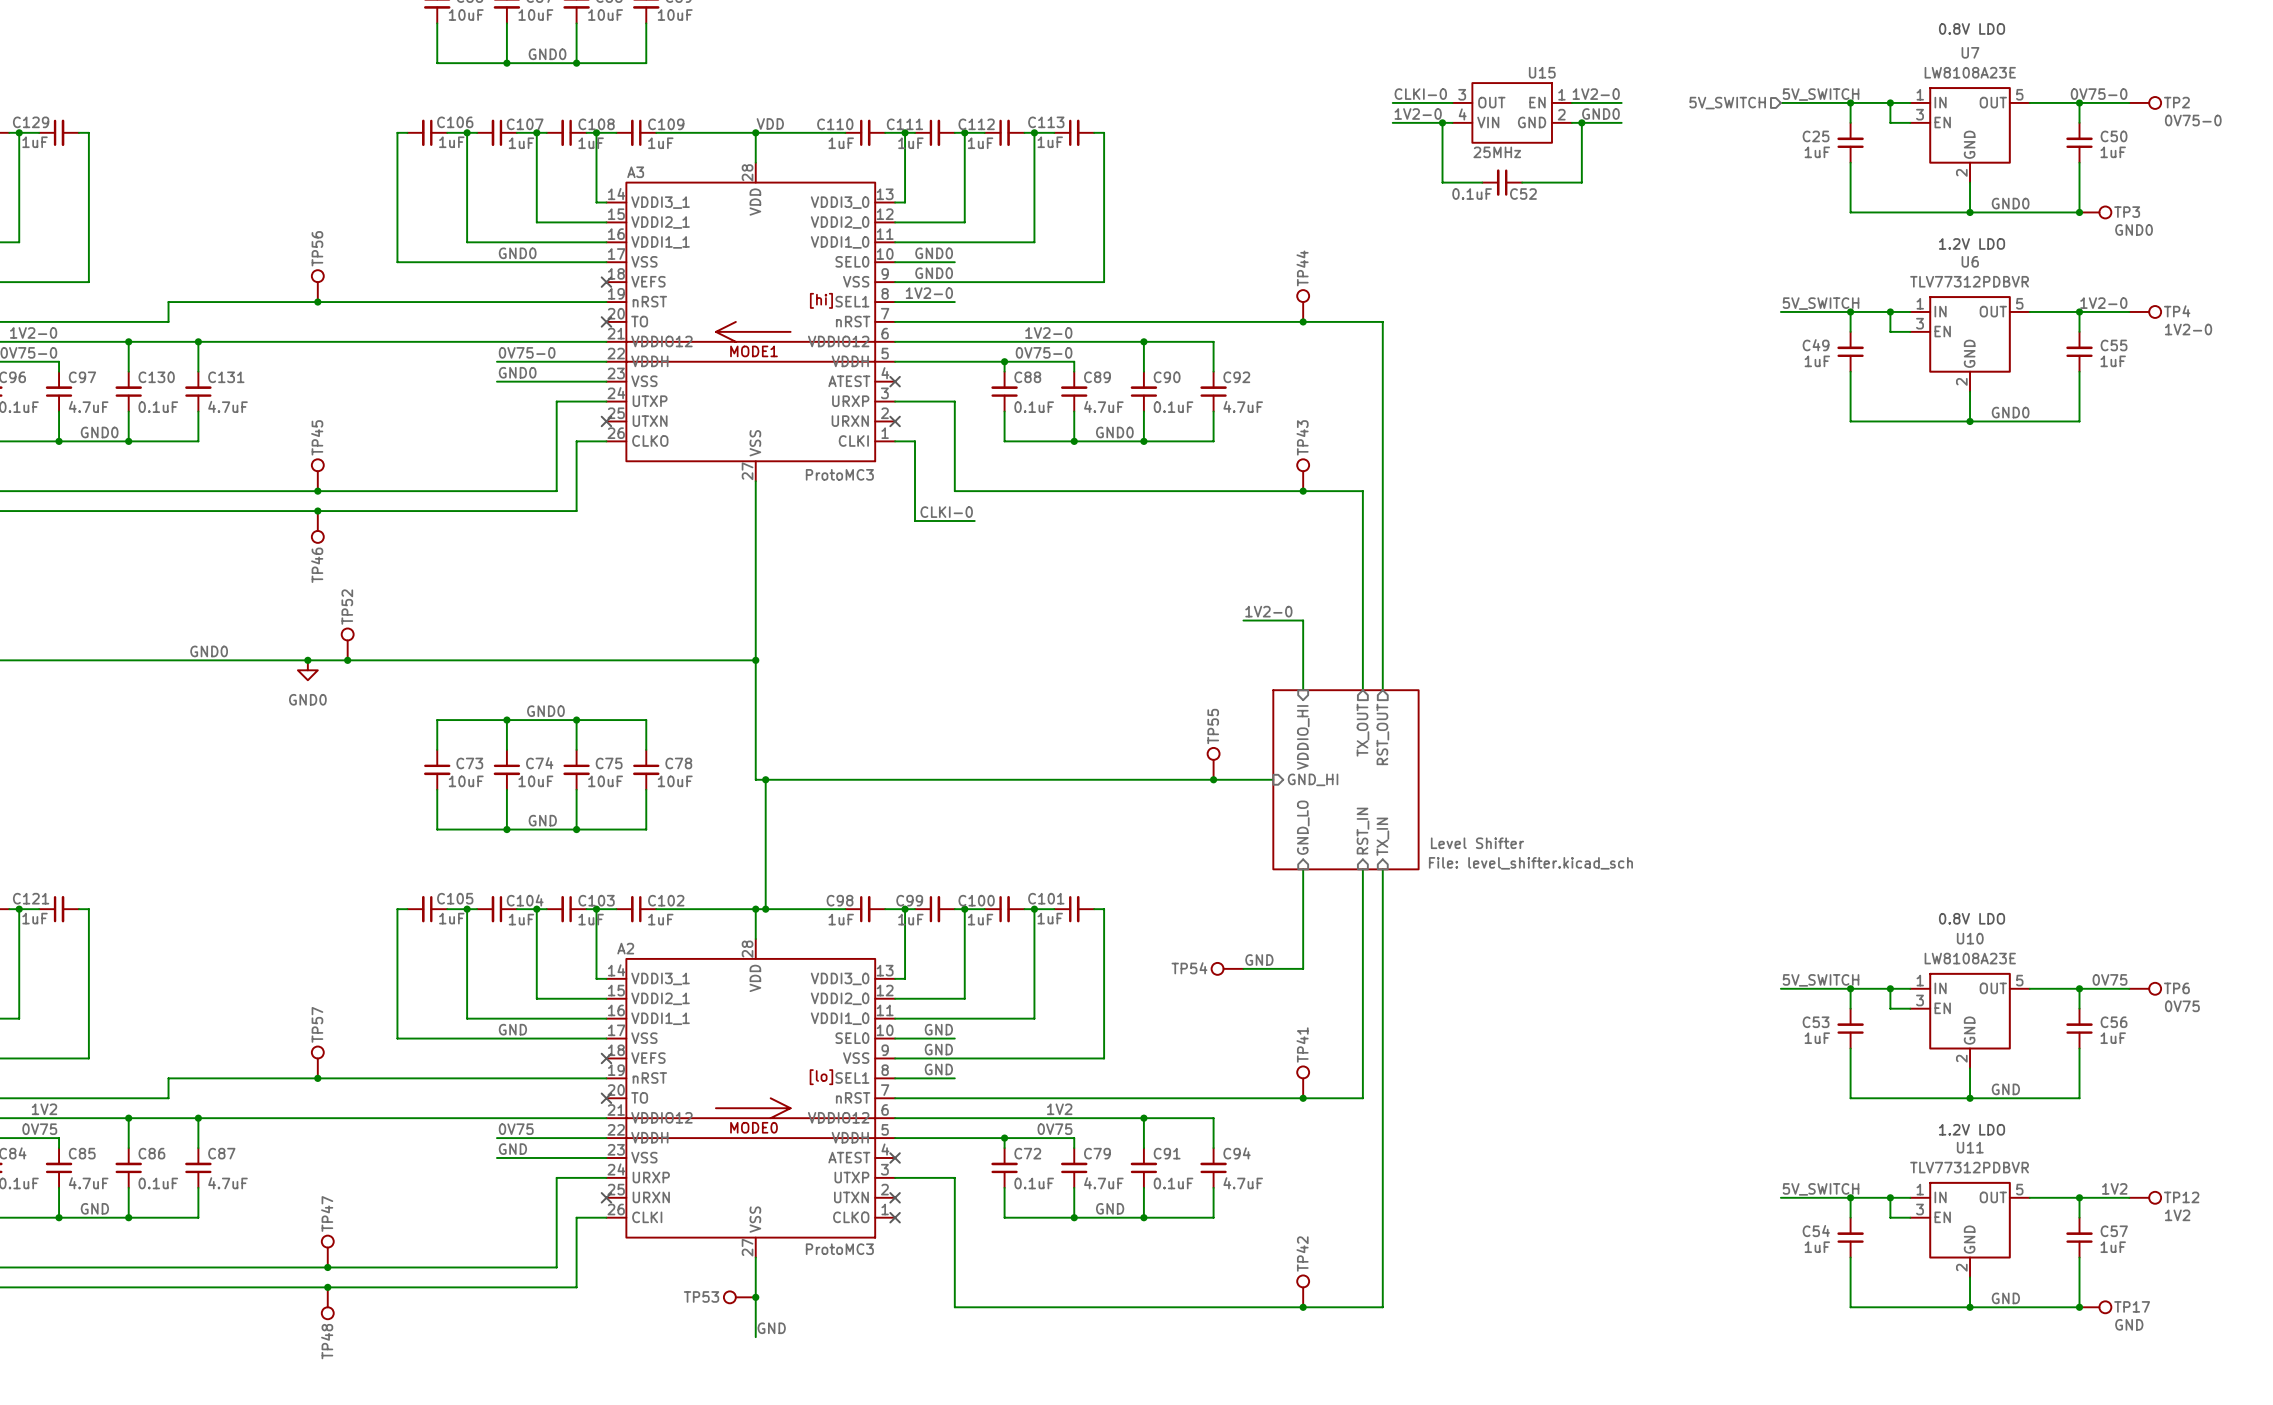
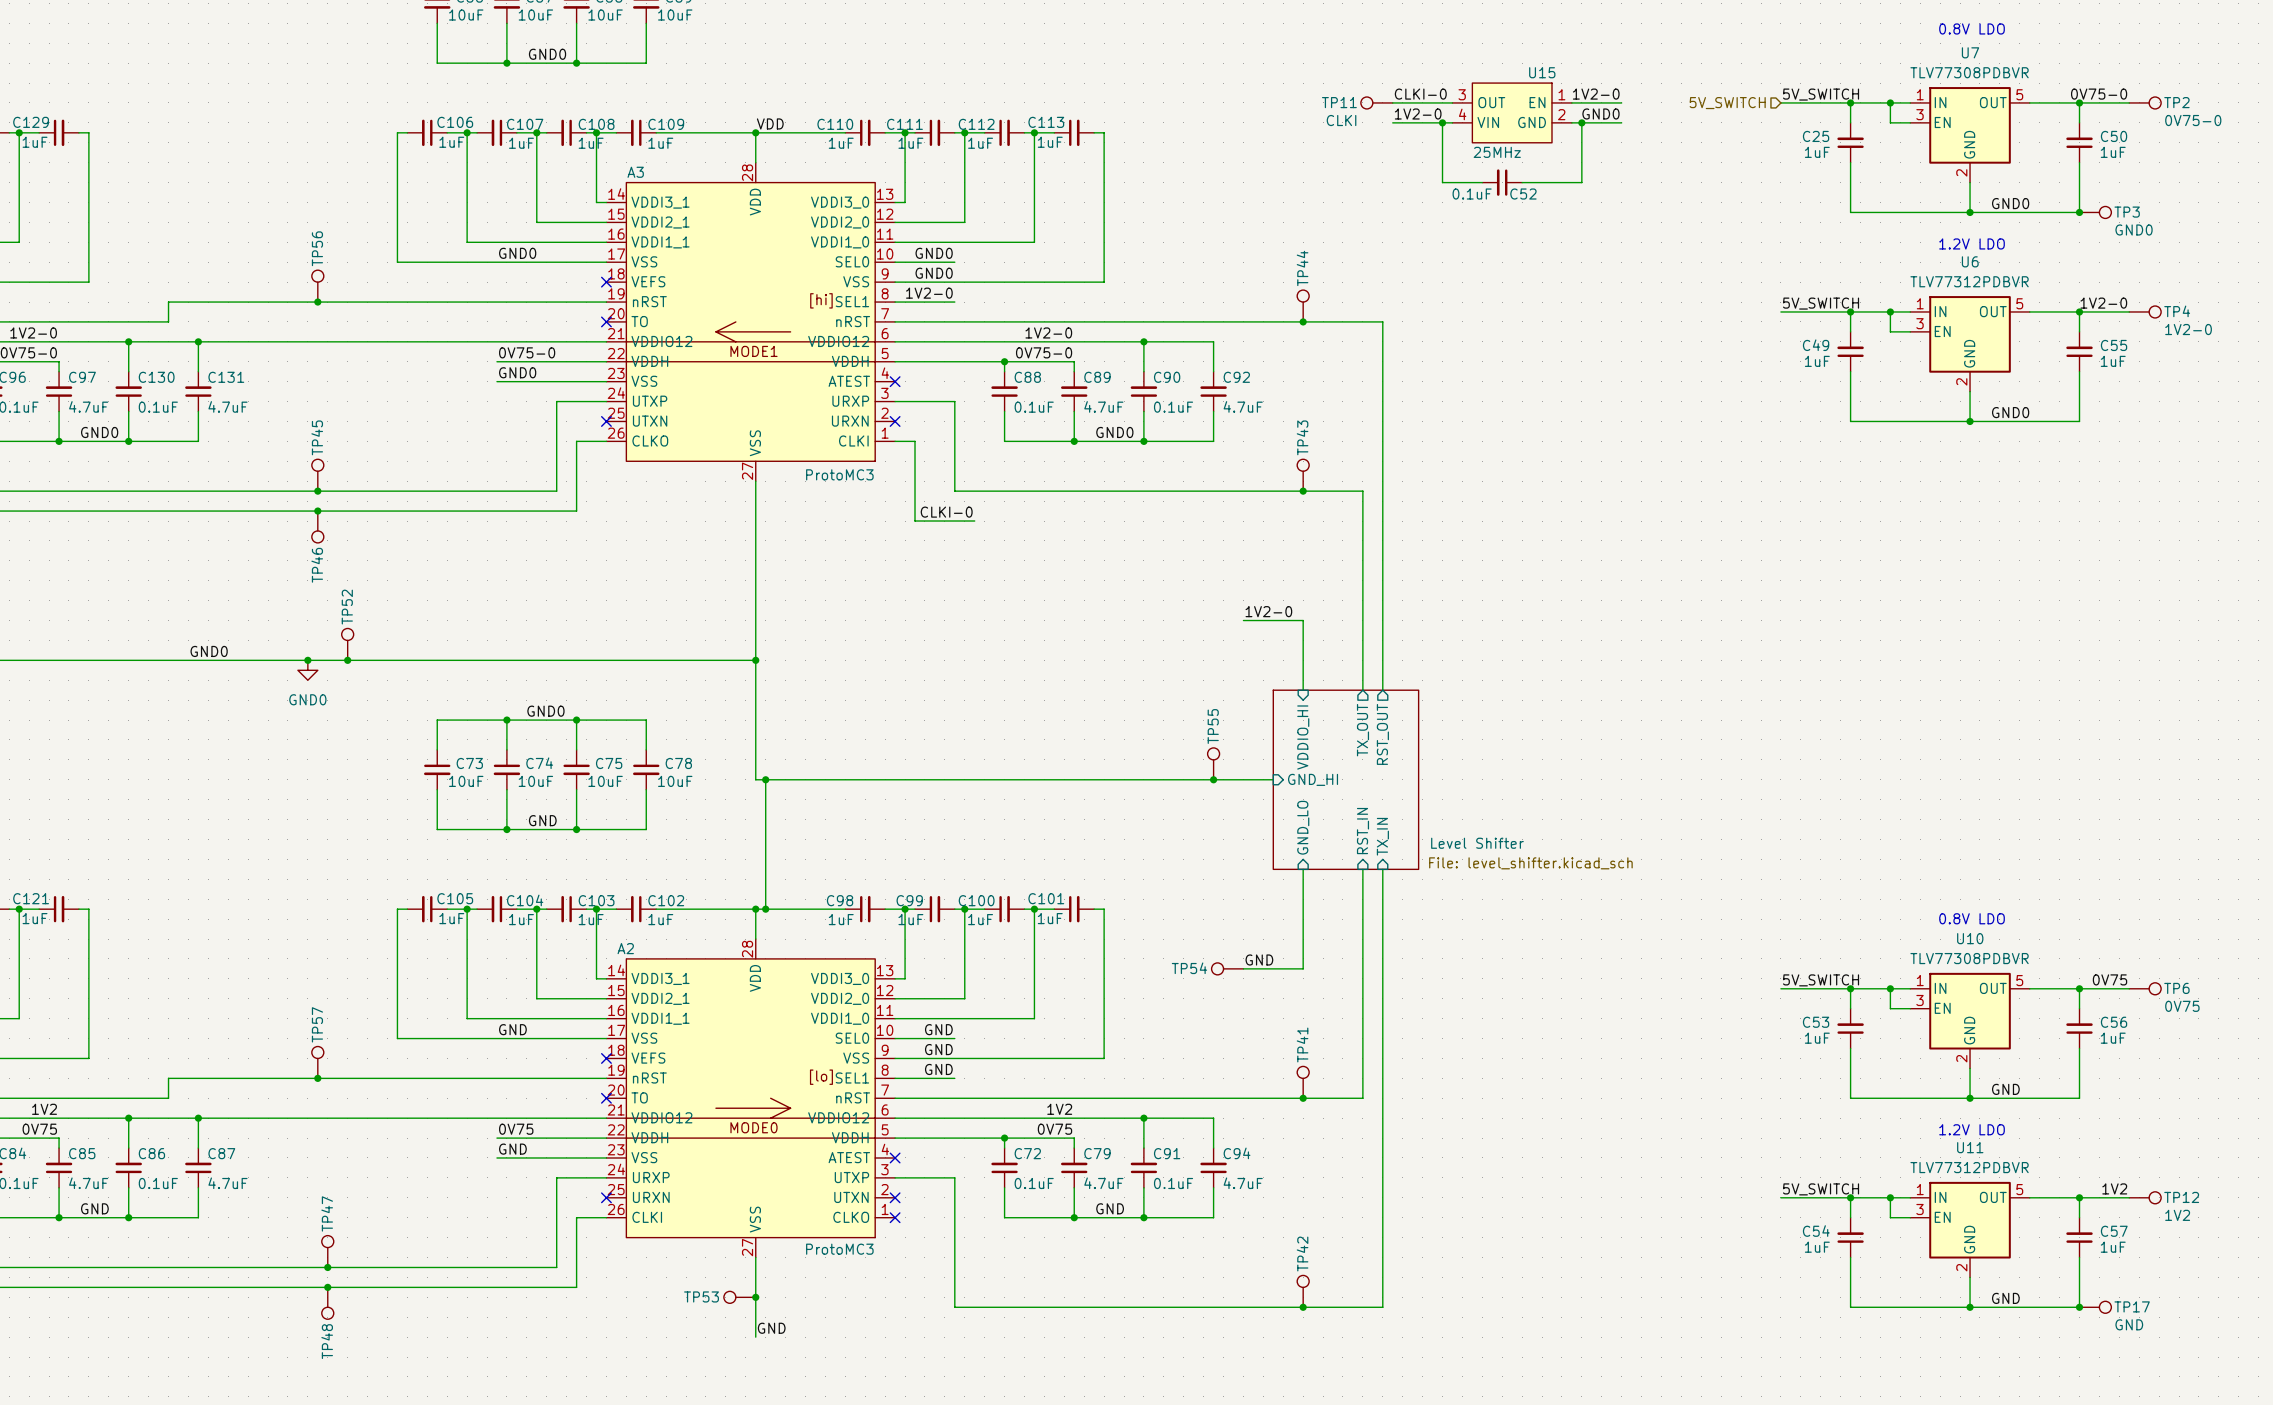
U7 value: LW8108A23E (1970, 72) -> TLV77308PDBVR (1969, 72)
TP11: none -> CLKI (1376, 102)
U10 value: LW8108A23E (1970, 958) -> TLV77308PDBVR (1969, 958)

